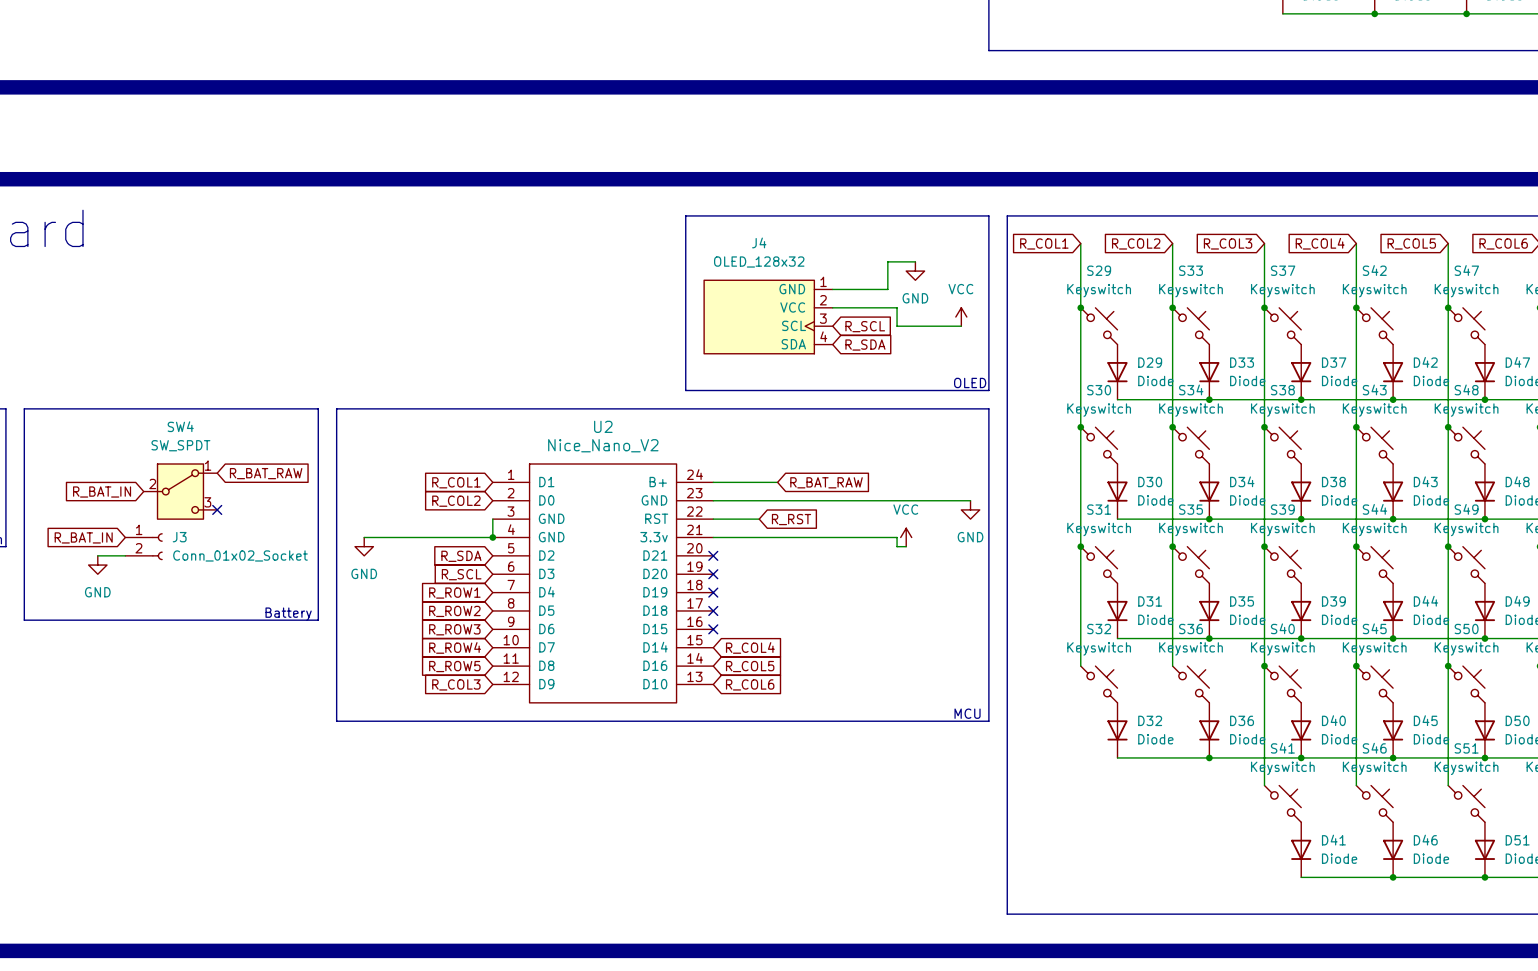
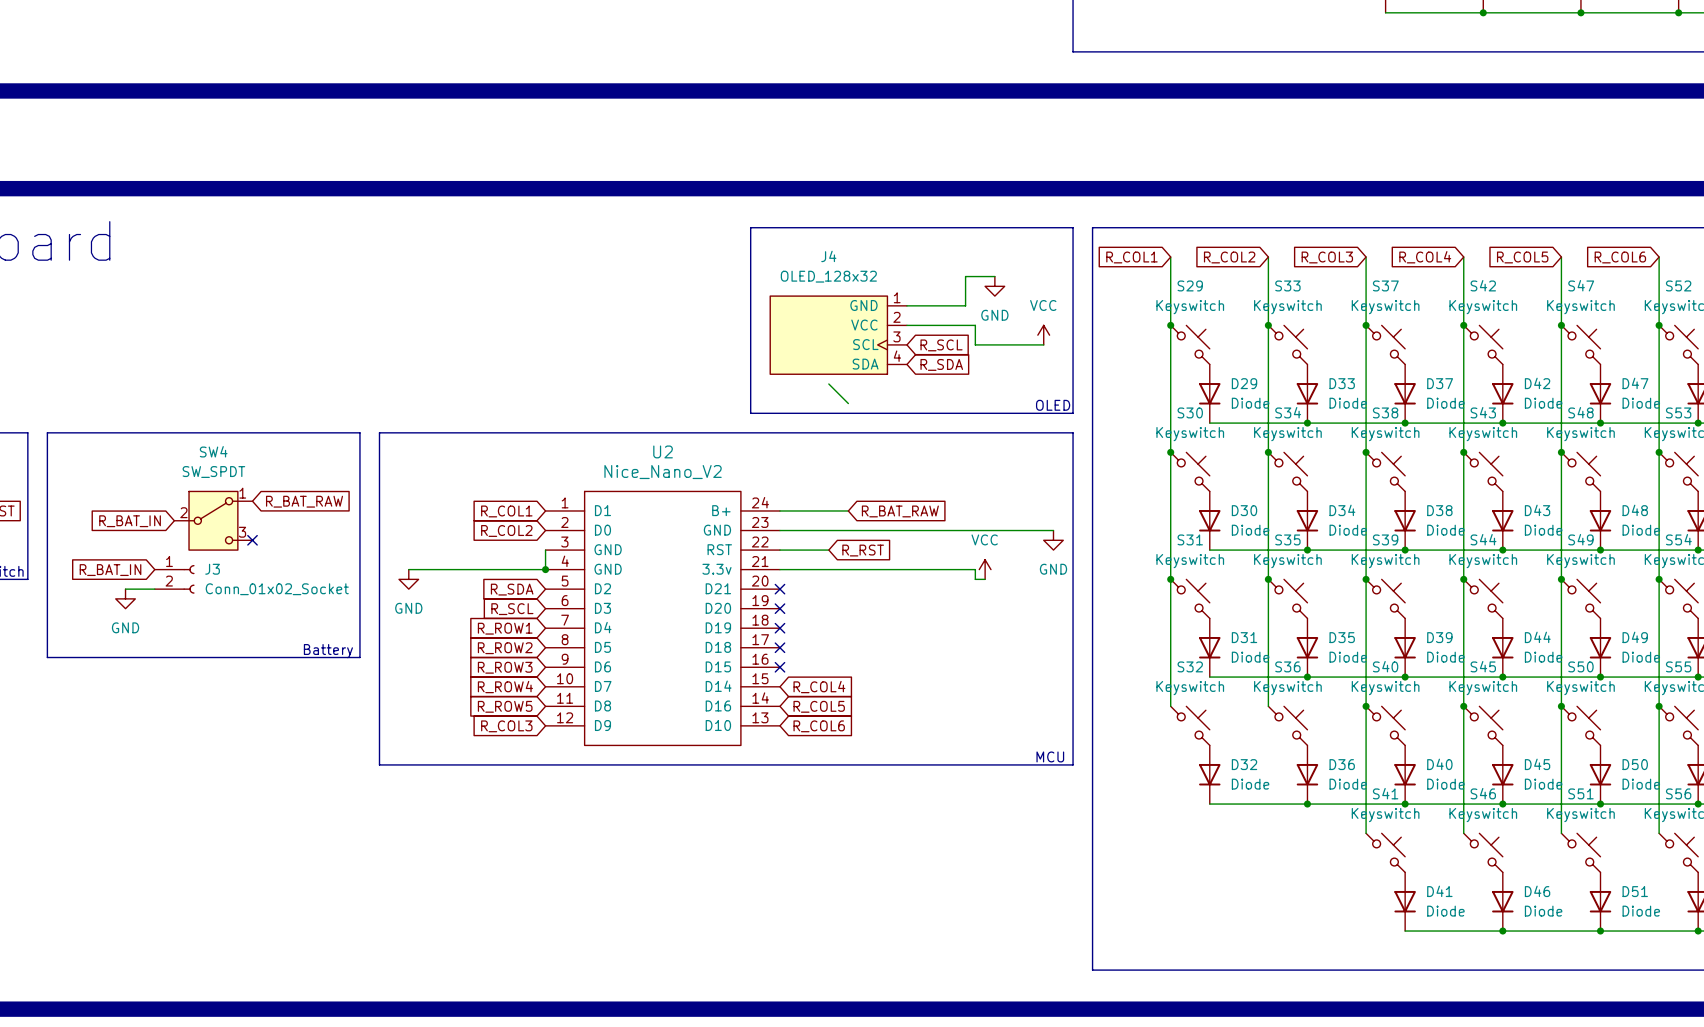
wire: none -> (828, 384) (848, 403)

